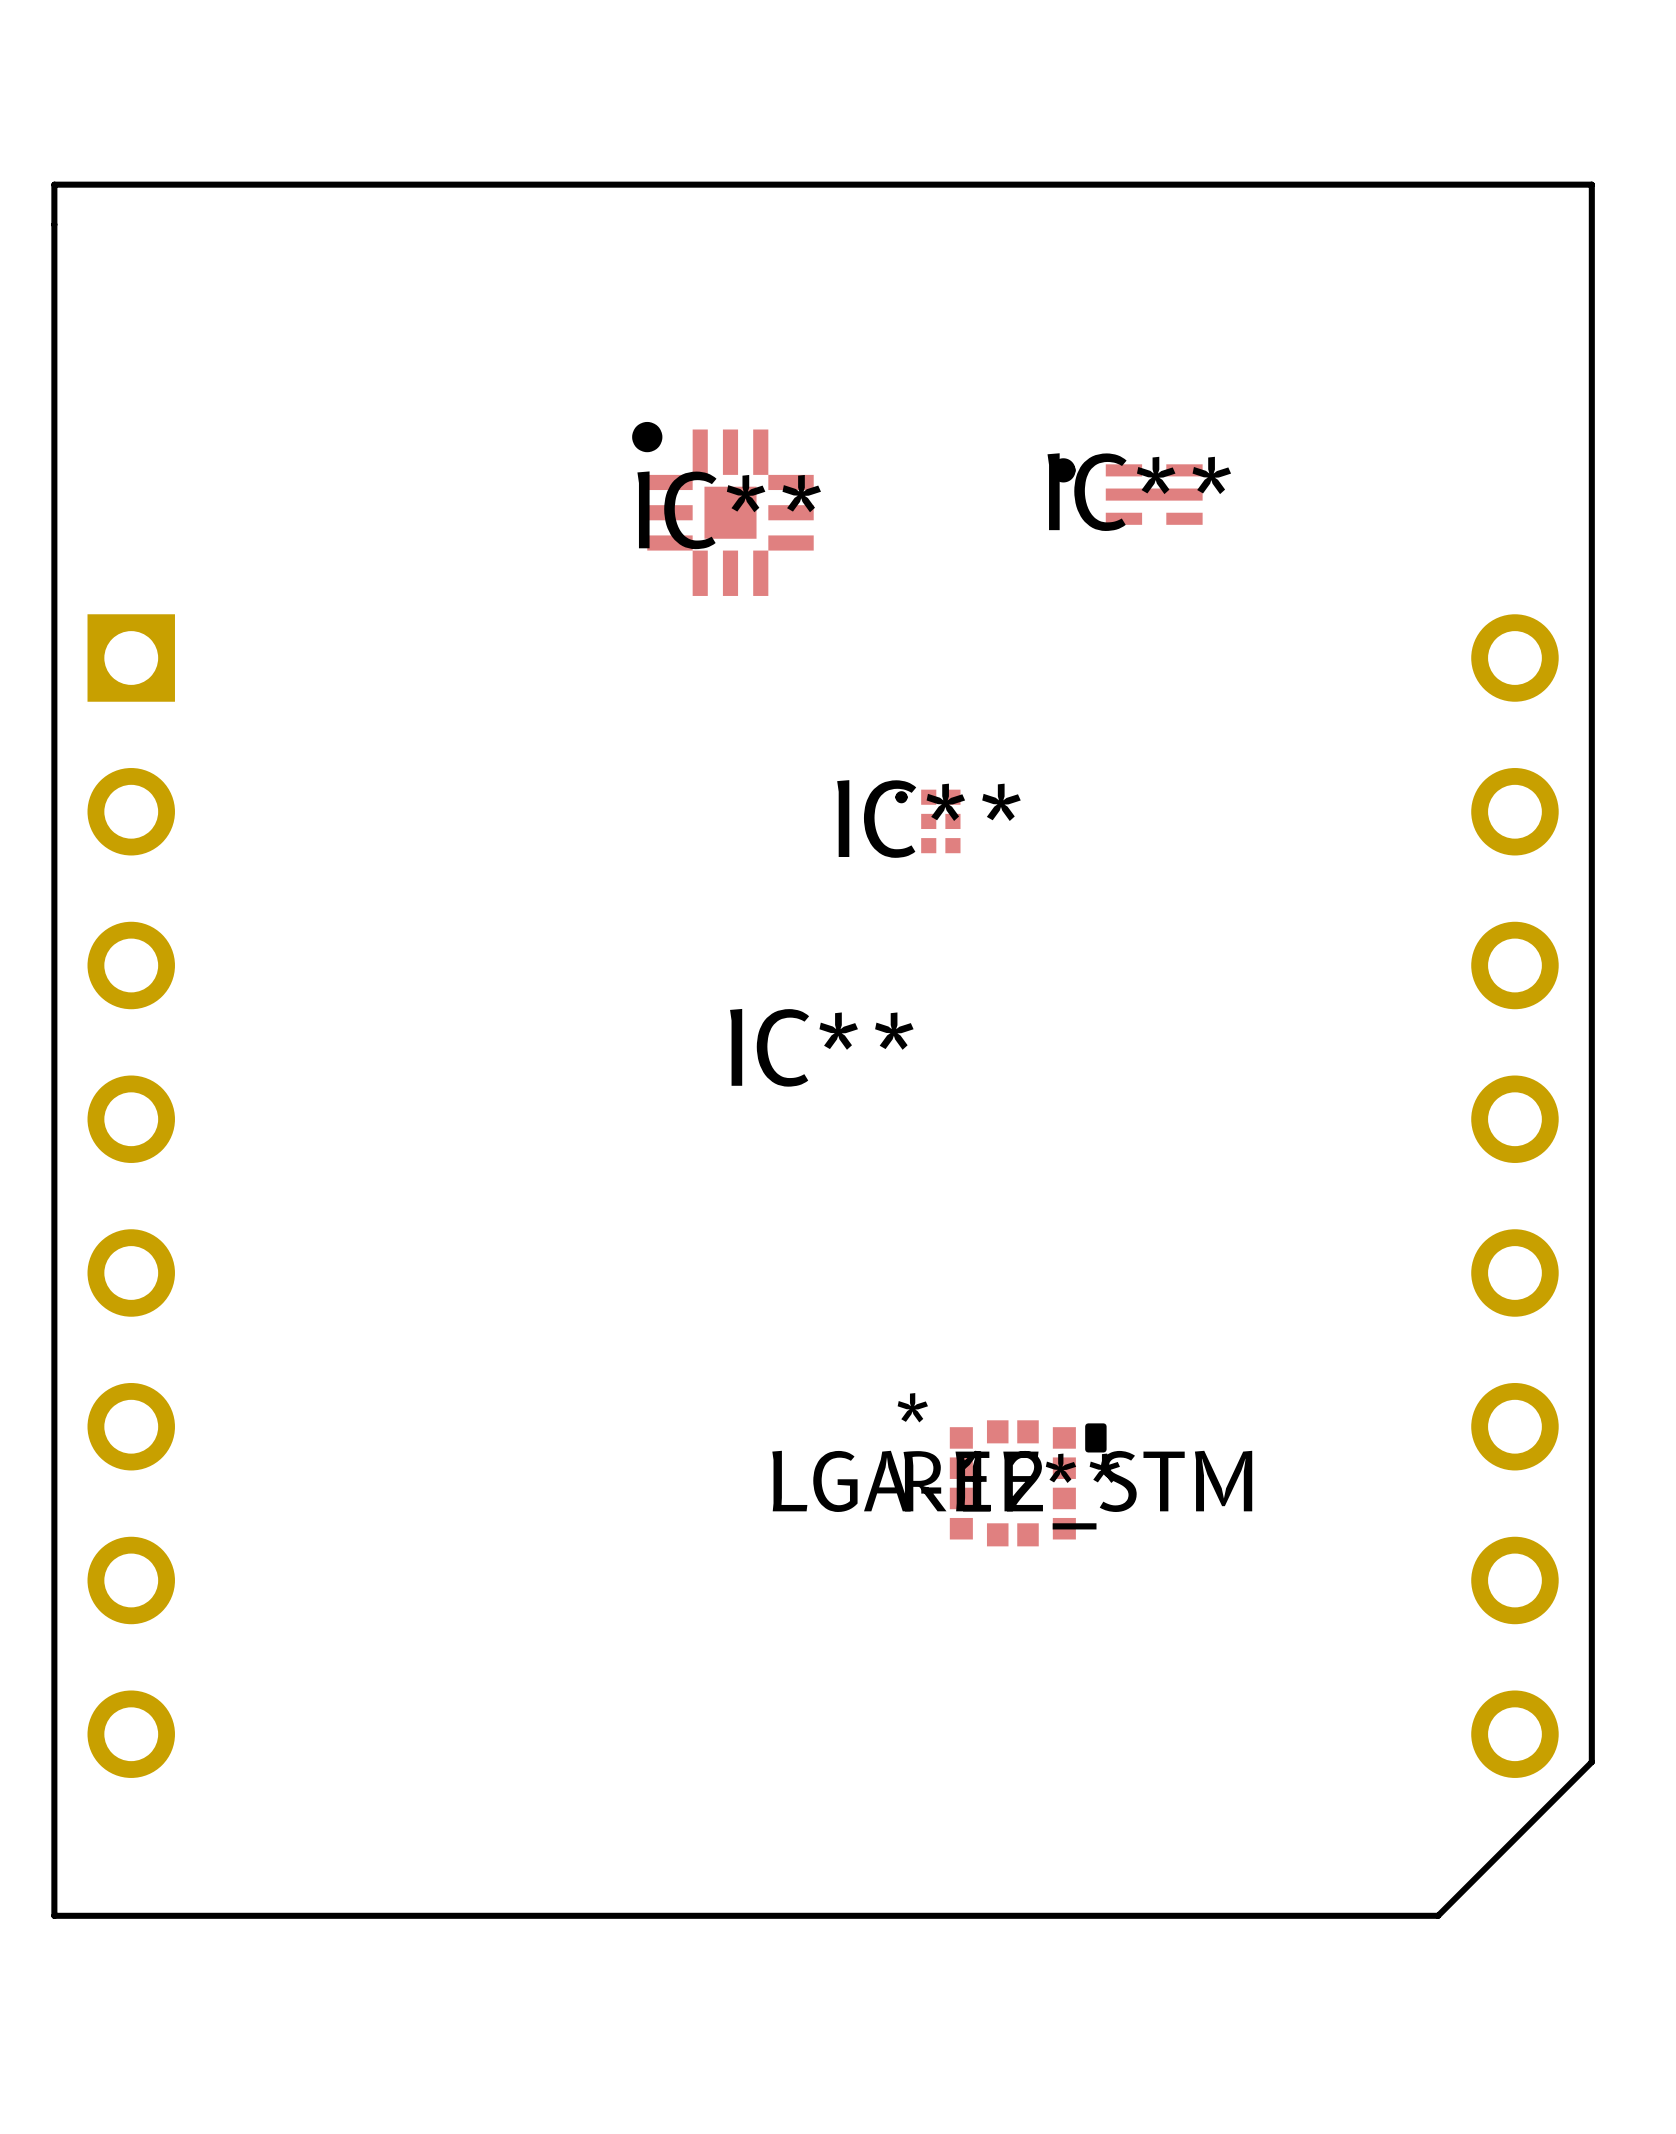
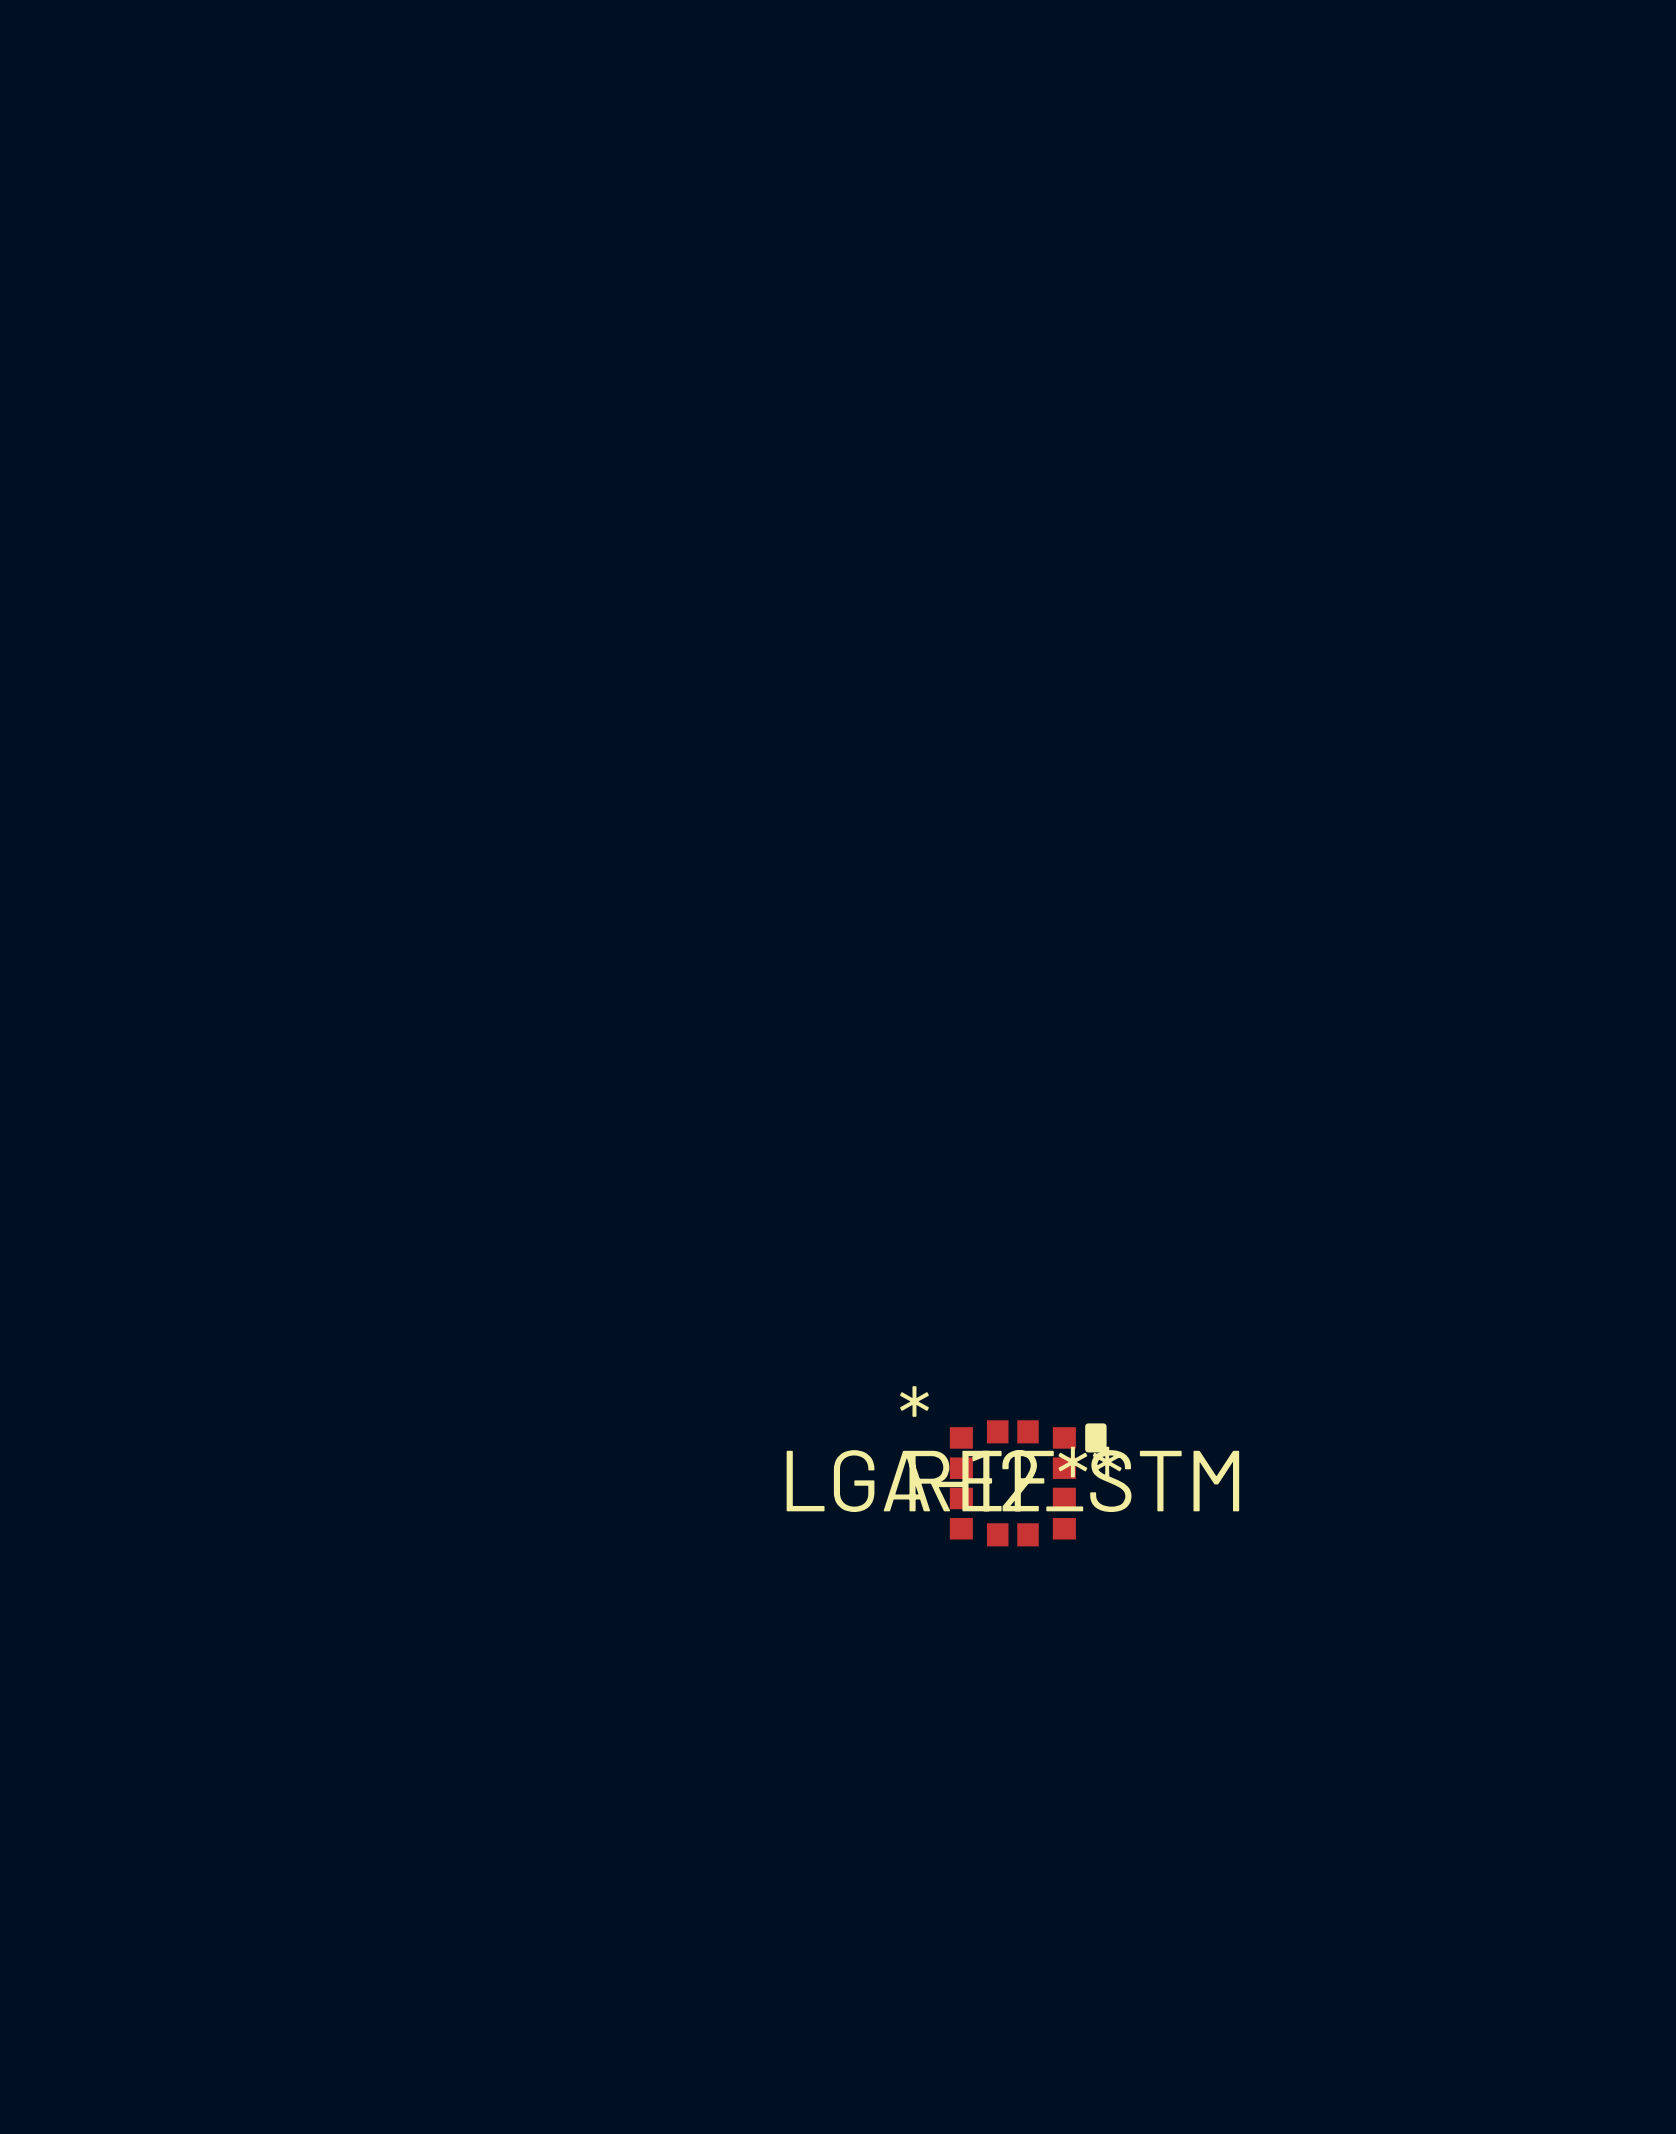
IC**: (1126, 491) -> none
IC**: (722, 508) -> none
IC**: (927, 821) -> none
IC**: (823, 1050) -> none

